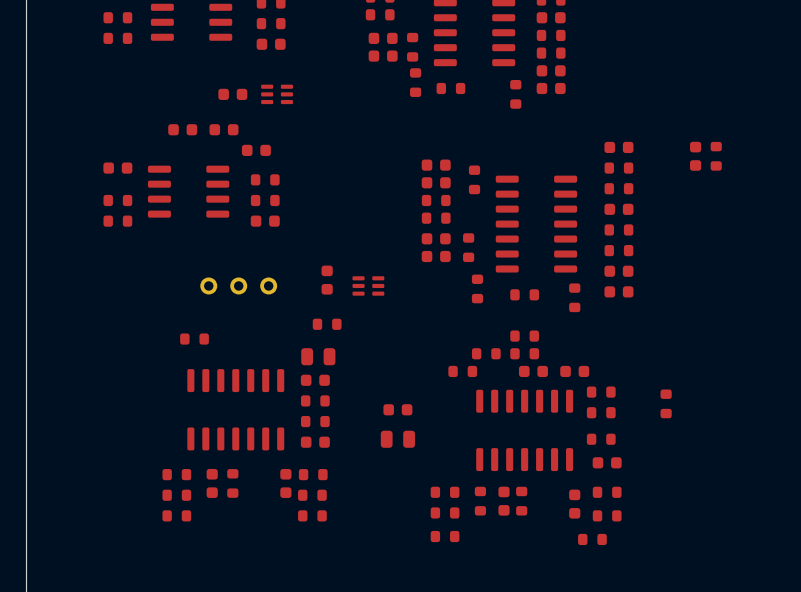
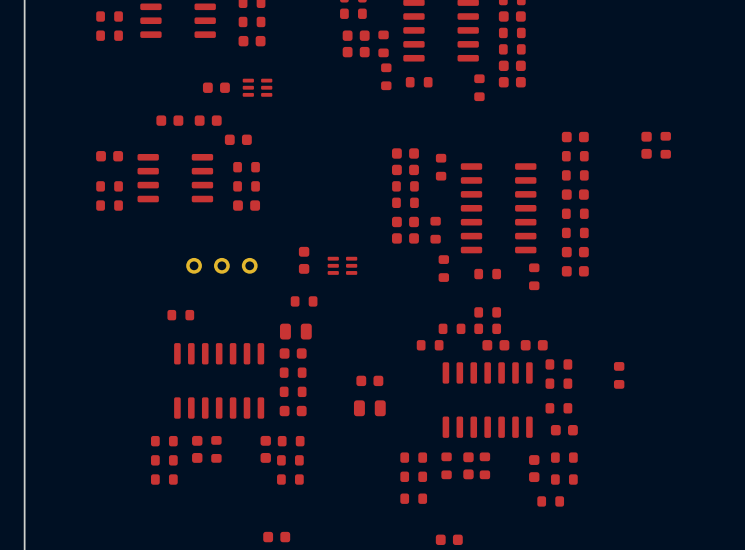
part: none -> (276, 537)
part: none -> (449, 539)

